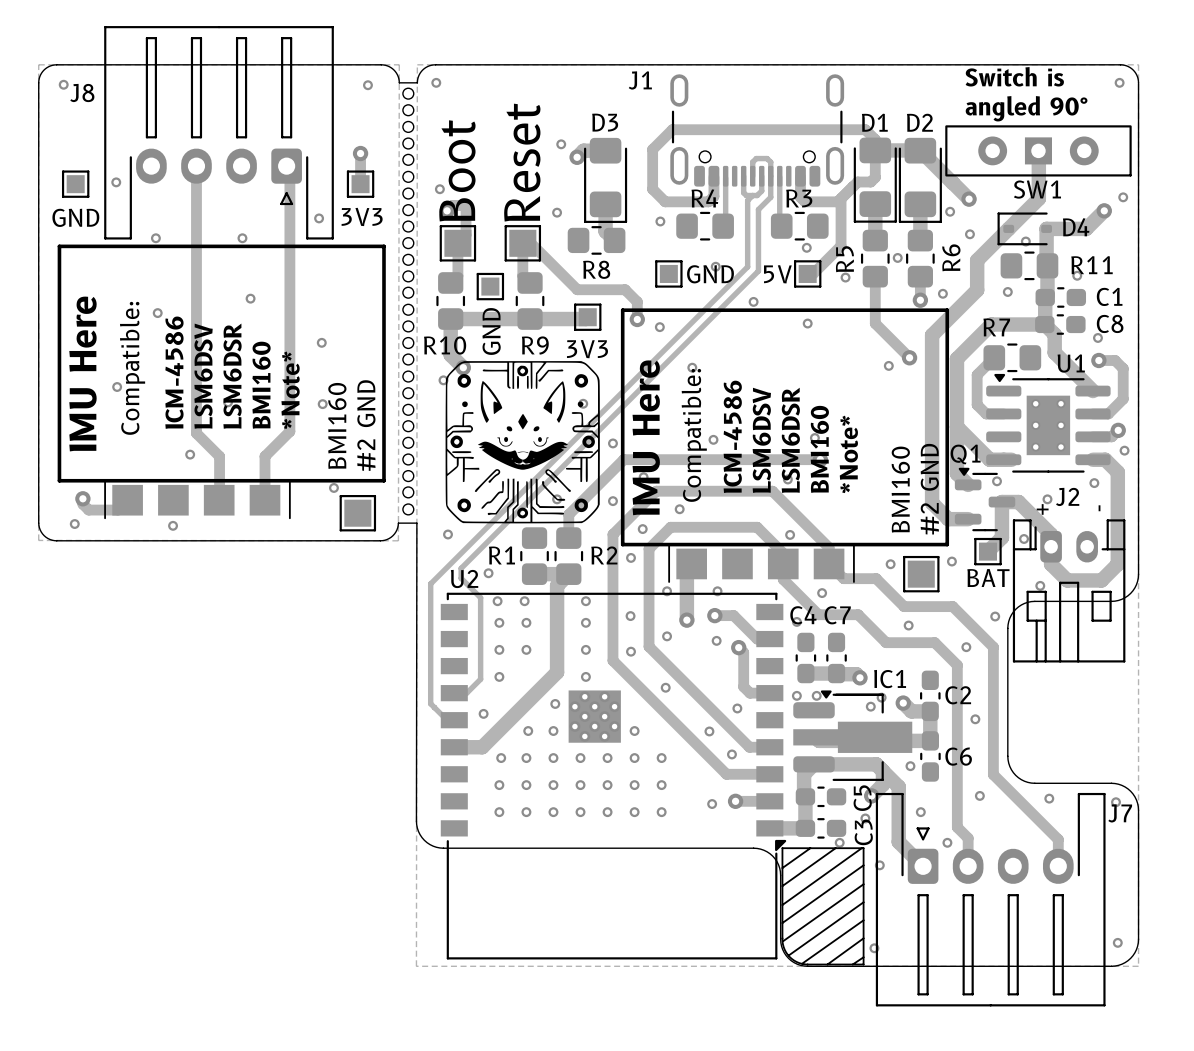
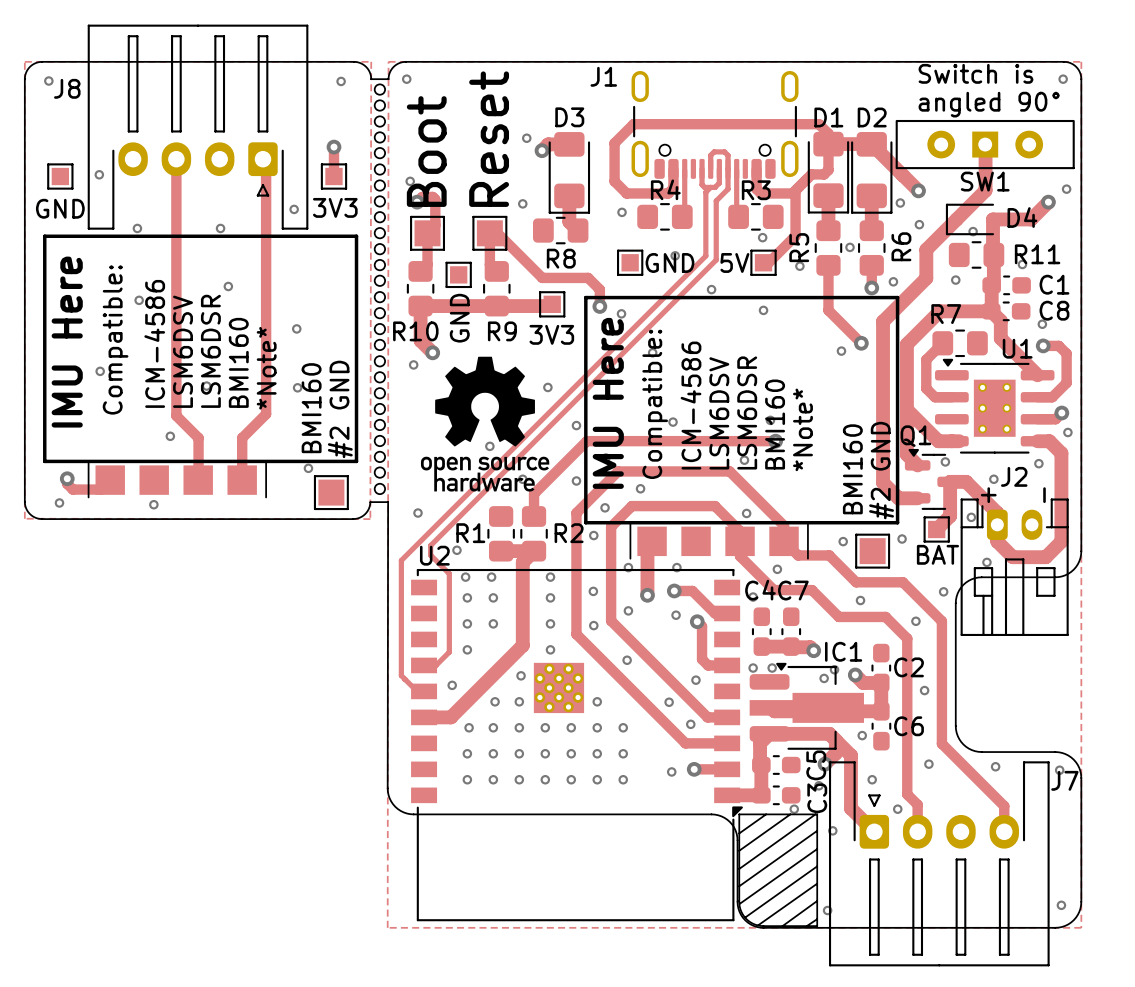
drawing: [445, 361, 600, 524] -> none
drawing shape: [518, 413, 528, 430] -> [435, 356, 535, 447]
drawing shape: [474, 469, 501, 492] -> [446, 456, 458, 471]
drawing shape: [545, 469, 571, 492] -> [517, 456, 527, 471]
drawing: none -> [420, 456, 550, 492]

